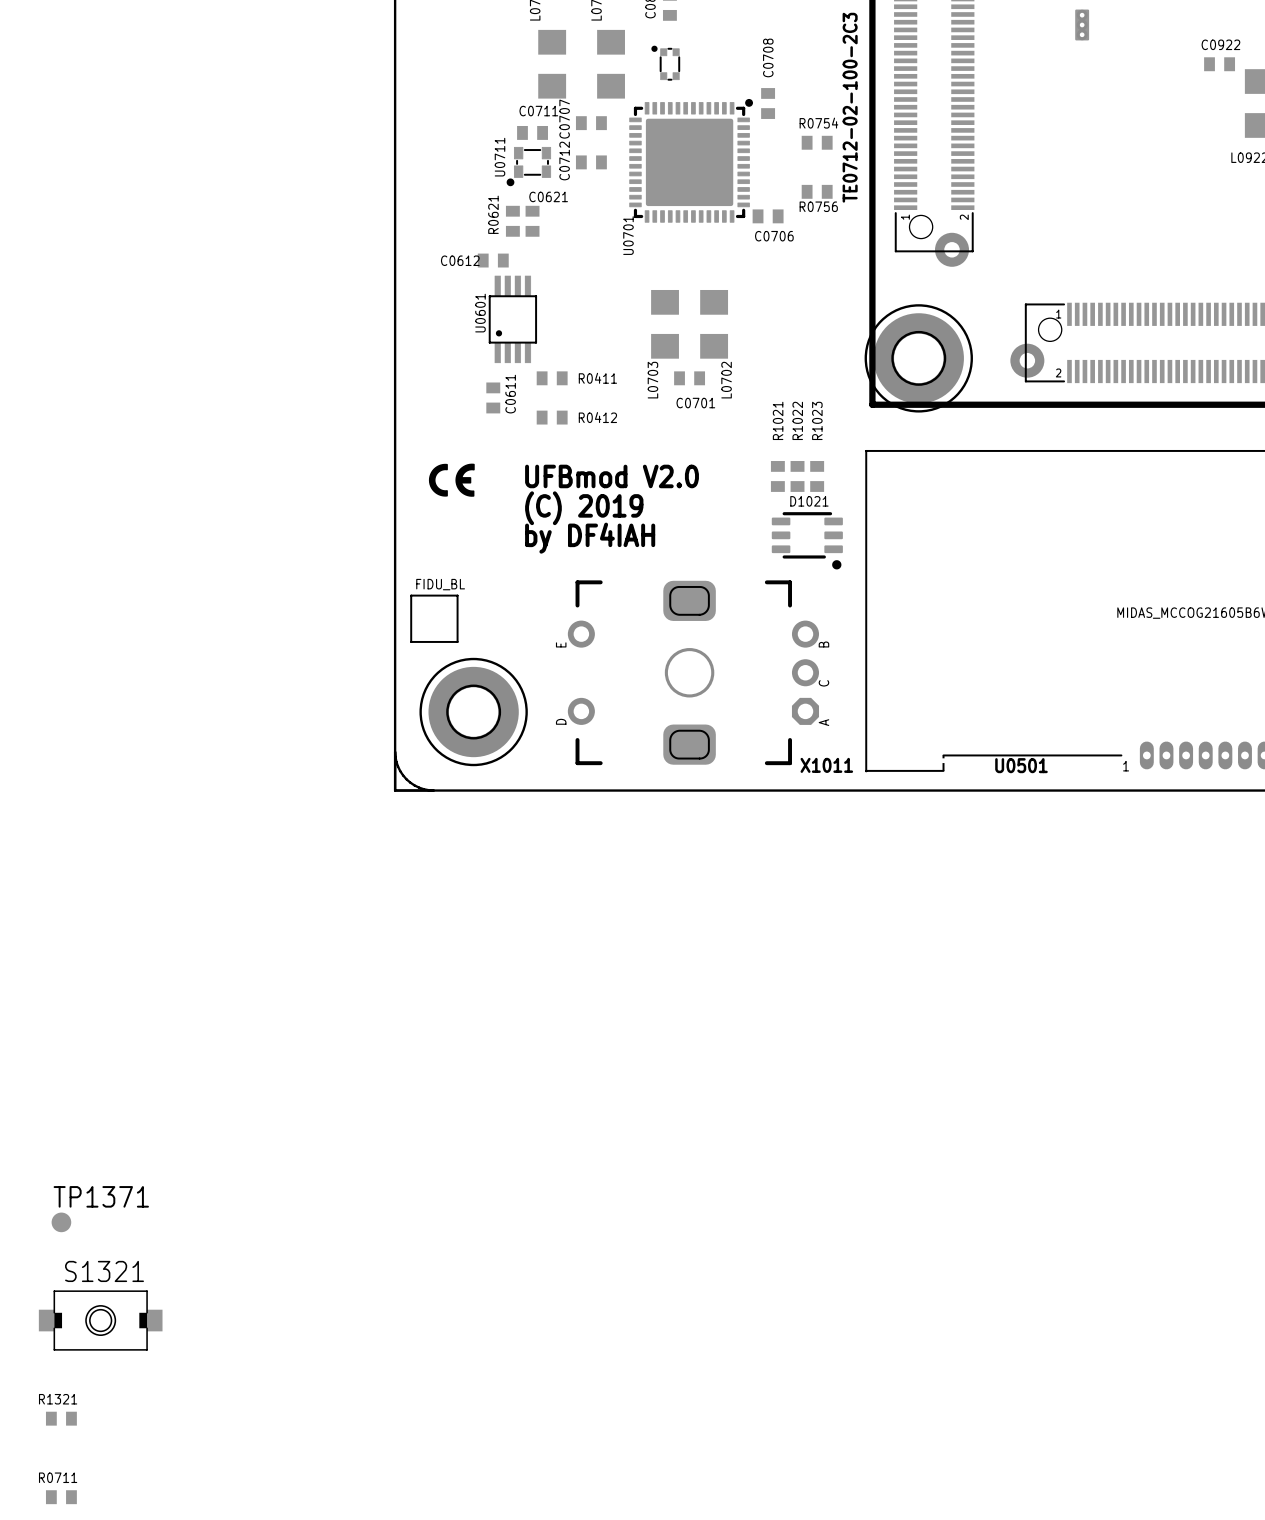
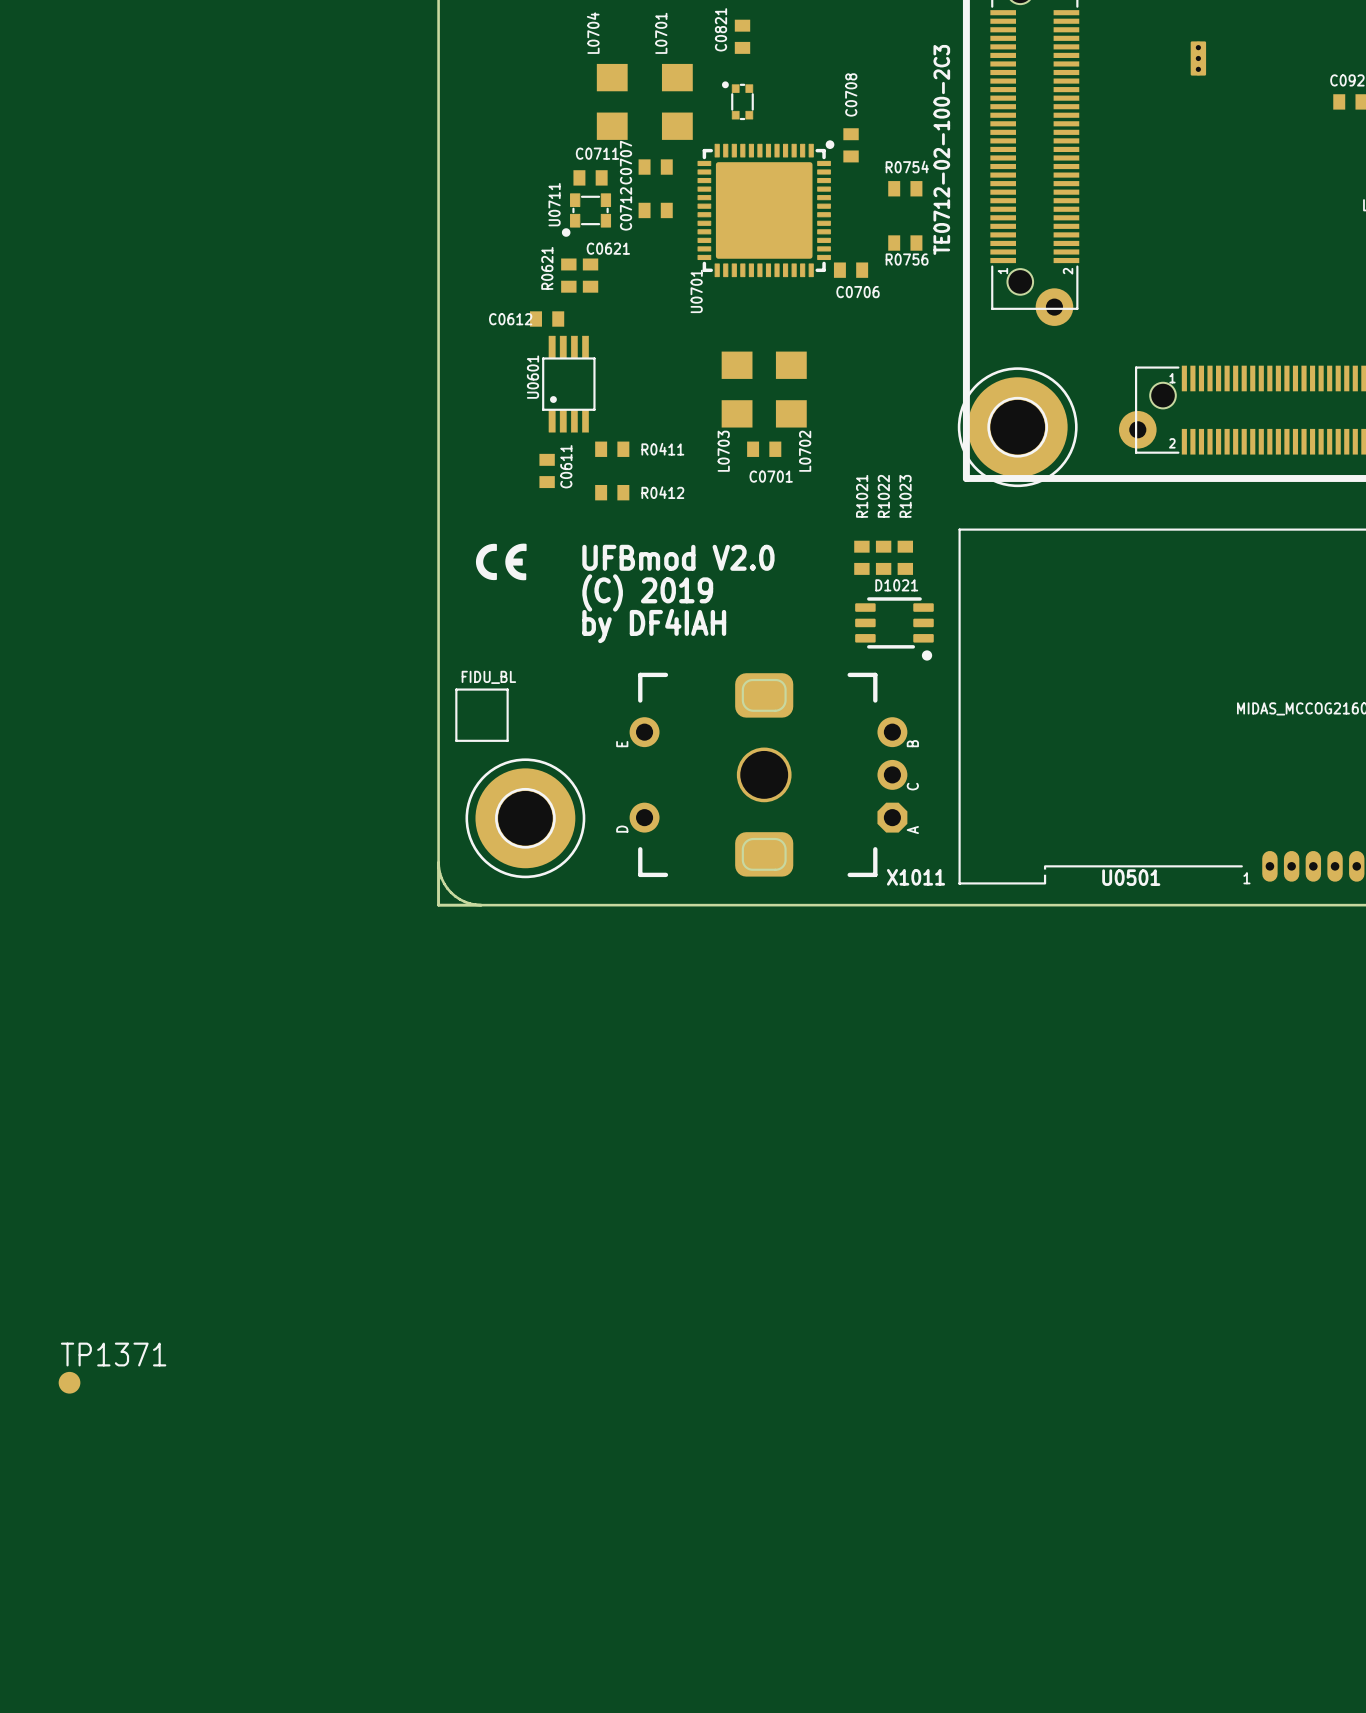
S1321: (100, 1320) -> none
R1321: (61, 1418) -> none
R0711: (61, 1497) -> none

